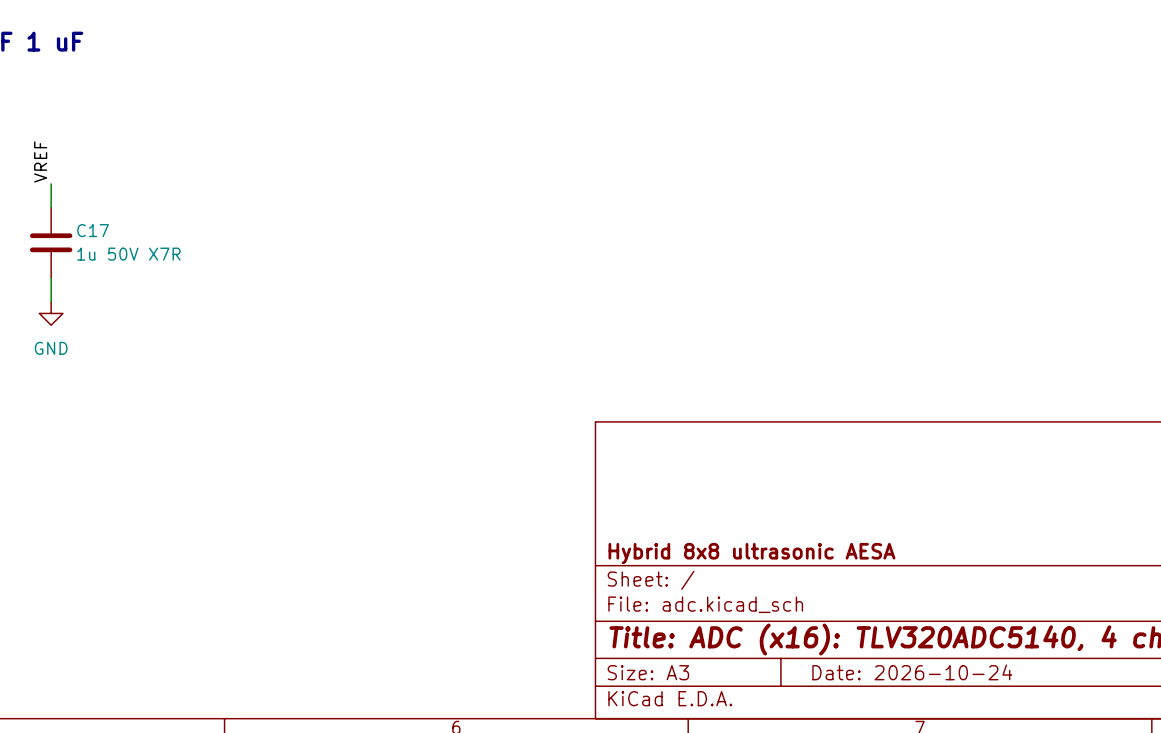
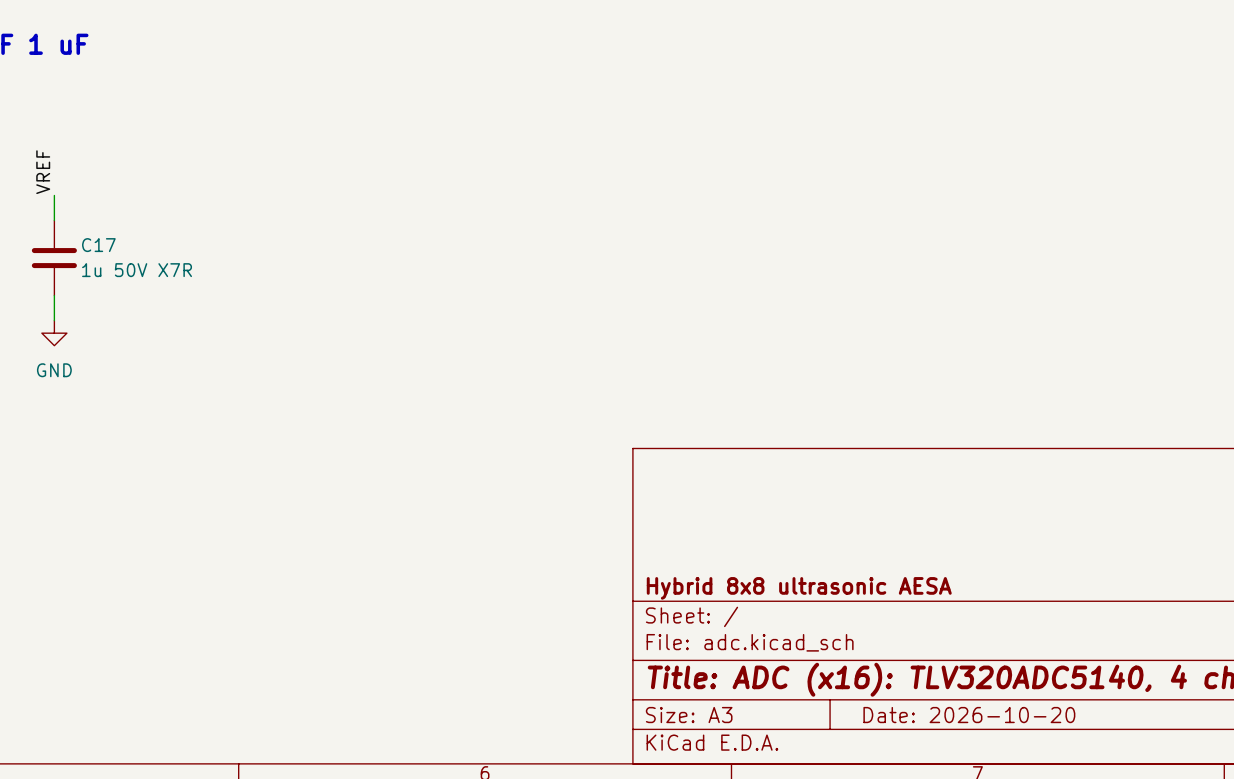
title block: Date: 2026-10-24 (912, 672) -> Date: 2026-10-20 (969, 715)

